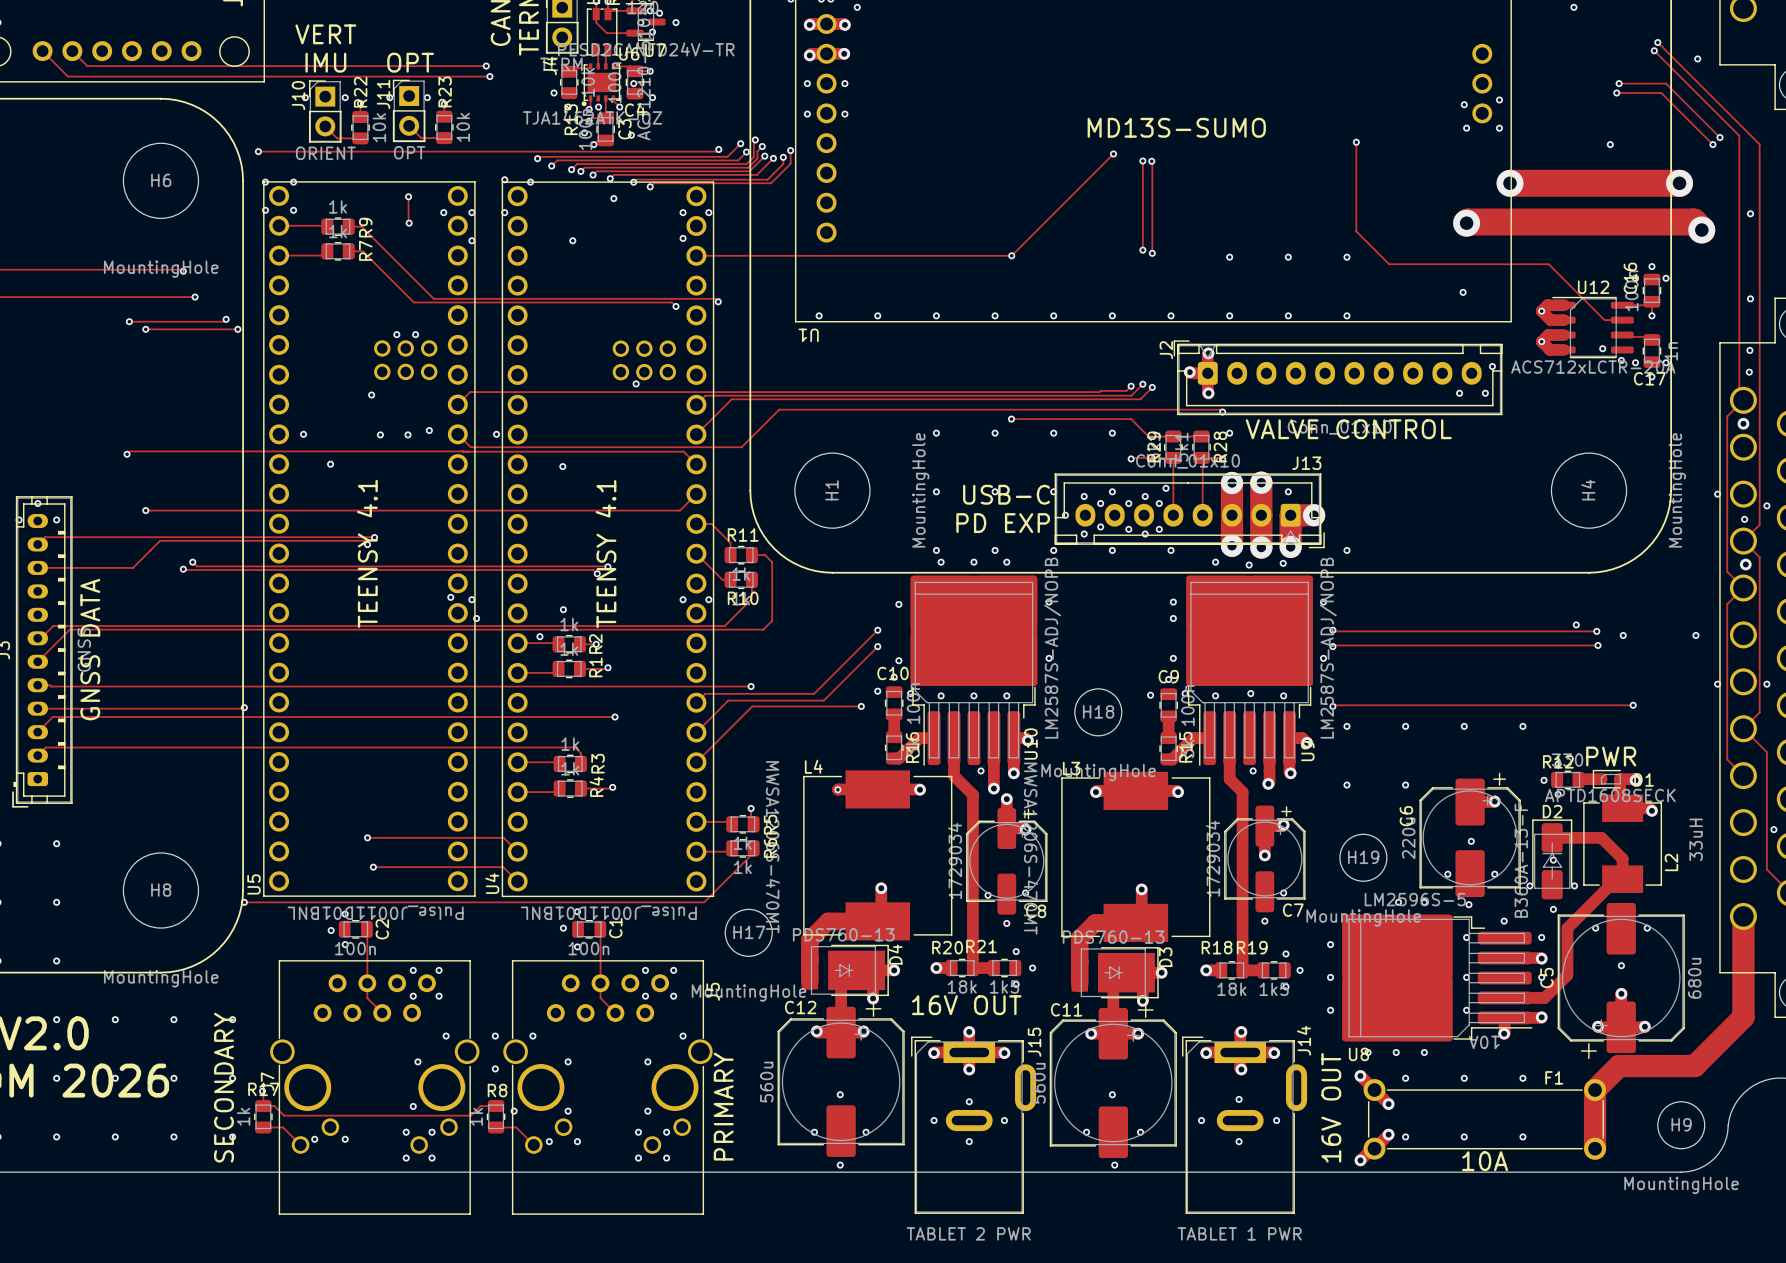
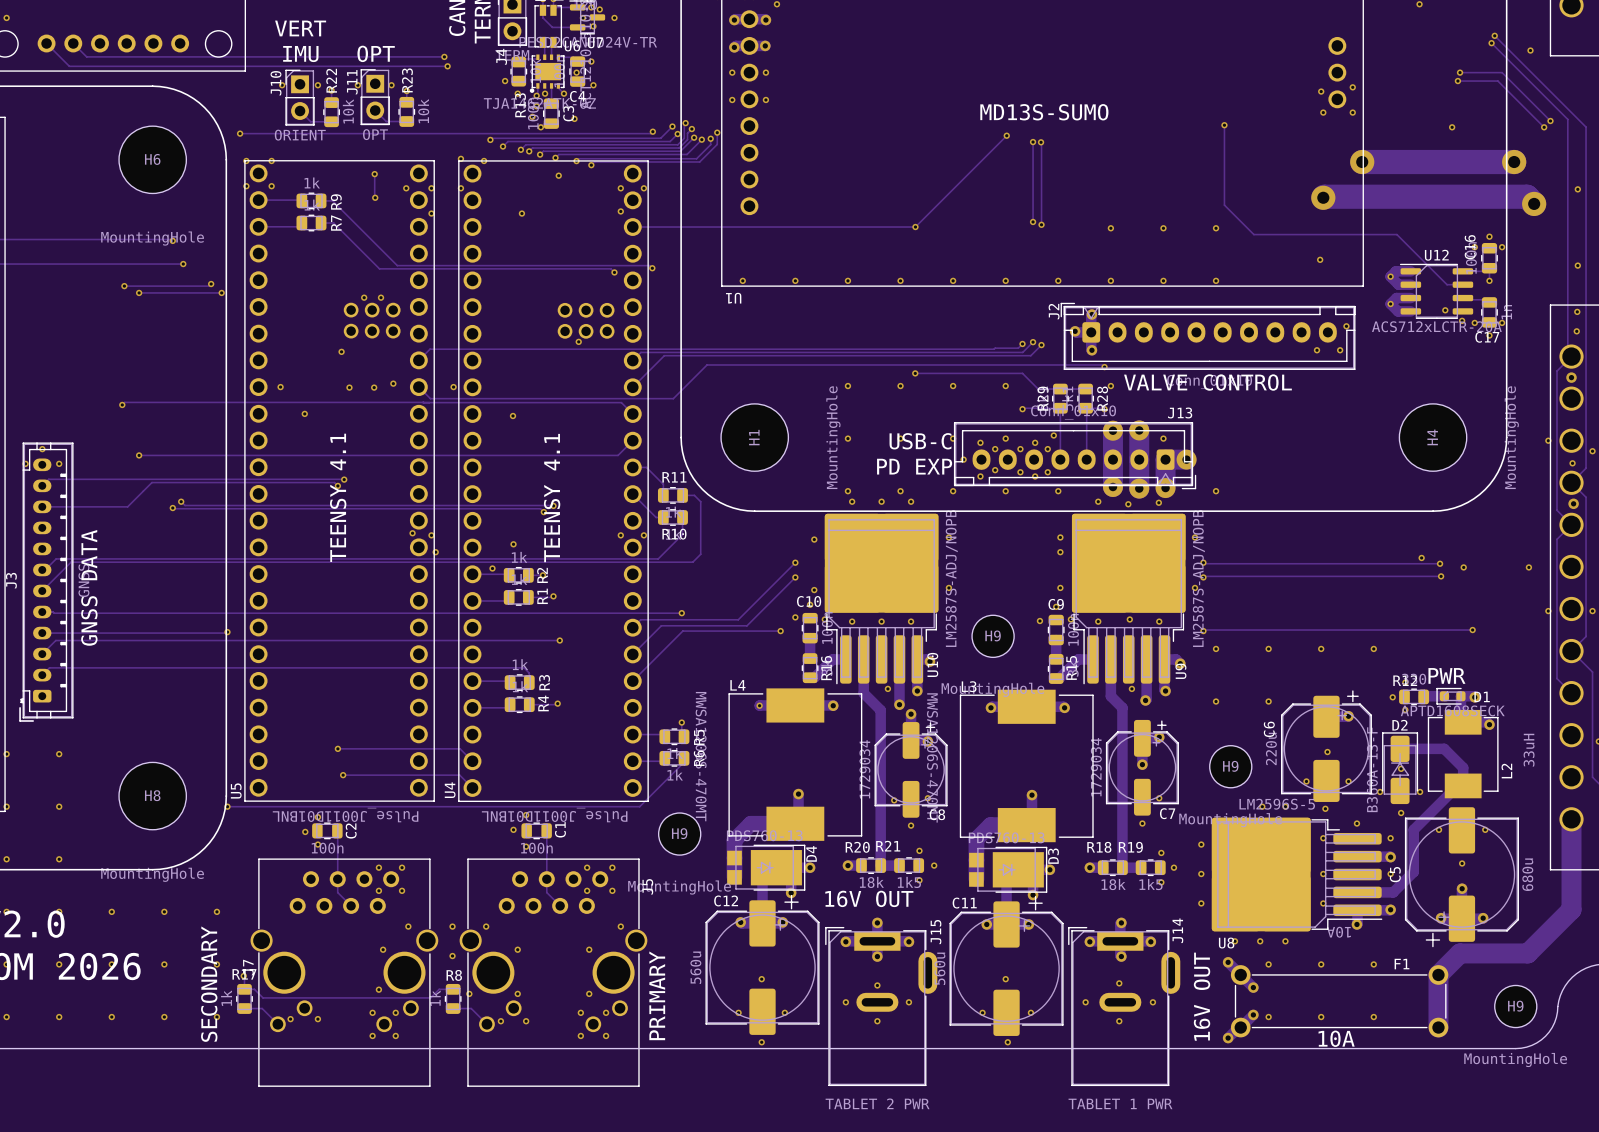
H18 name: H18 (1098, 711) -> H9 (993, 635)
H19 name: H19 (1363, 857) -> H9 (1230, 766)
H17 name: H17 (749, 932) -> H9 (679, 833)

